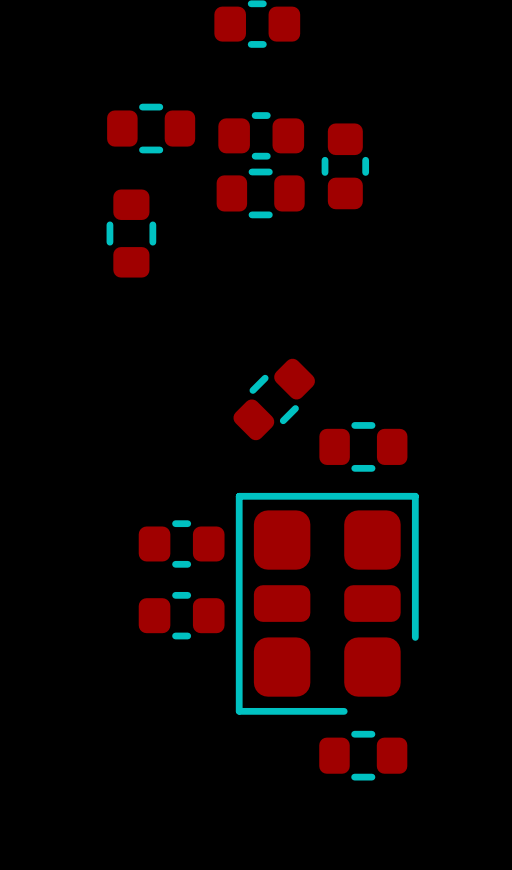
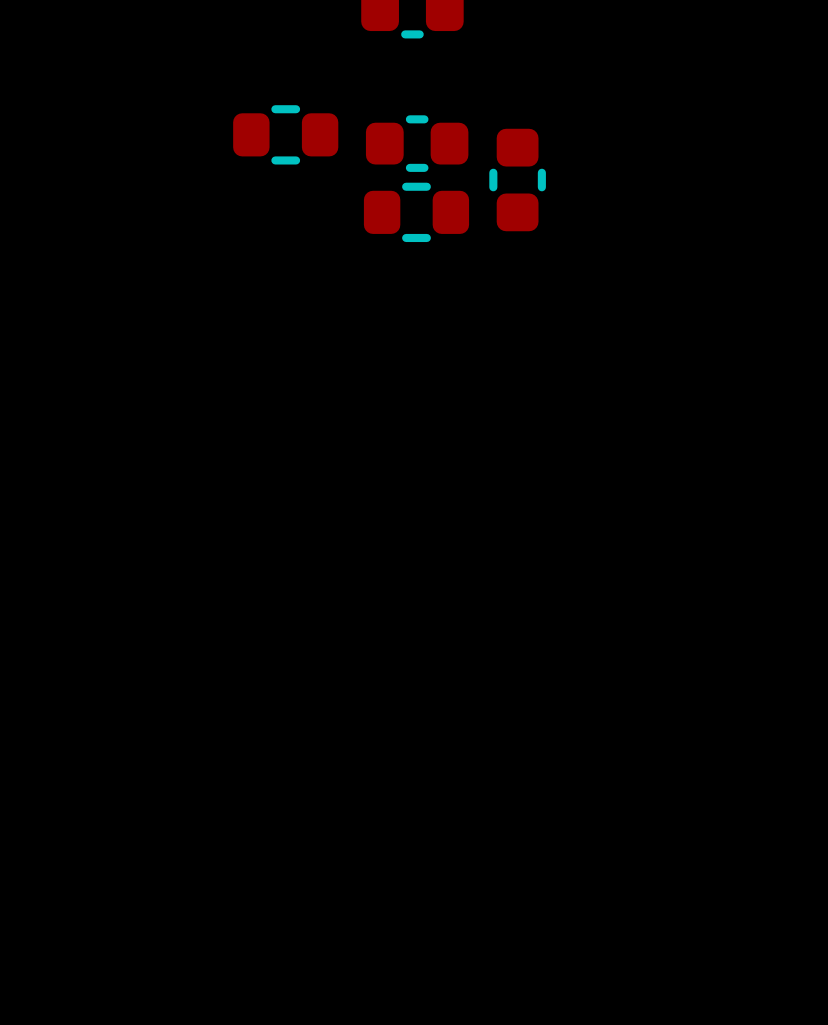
part: (131, 233) -> none
part: (274, 399) -> none
part: (363, 446) -> none
part: (181, 543) -> none
part: (327, 603) -> none
part: (181, 615) -> none
part: (363, 755) -> none

